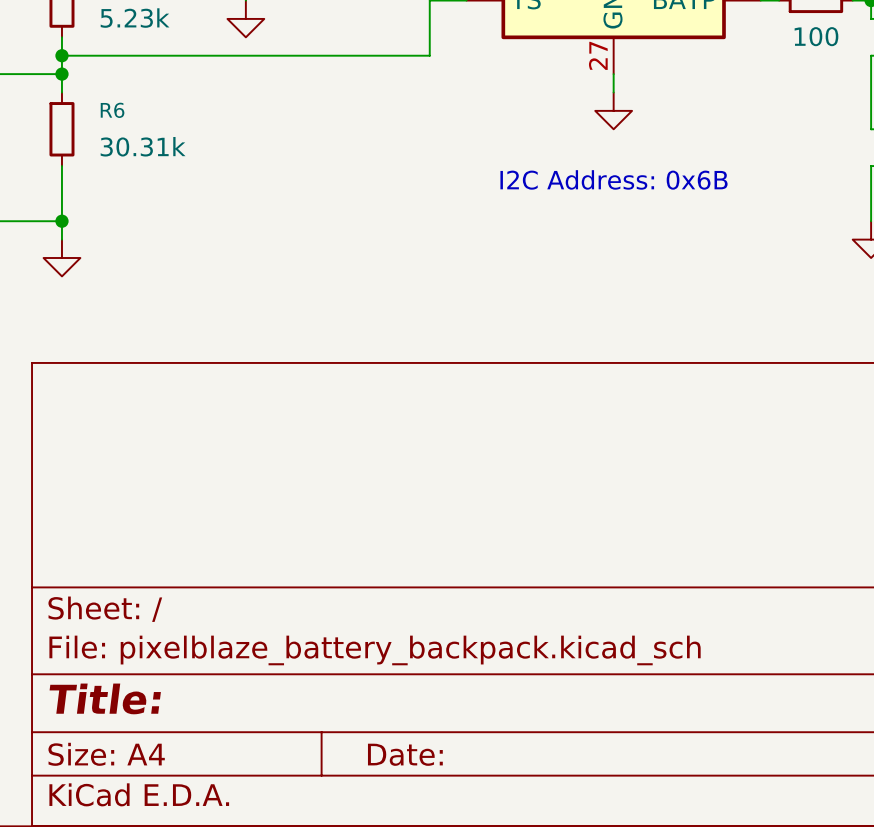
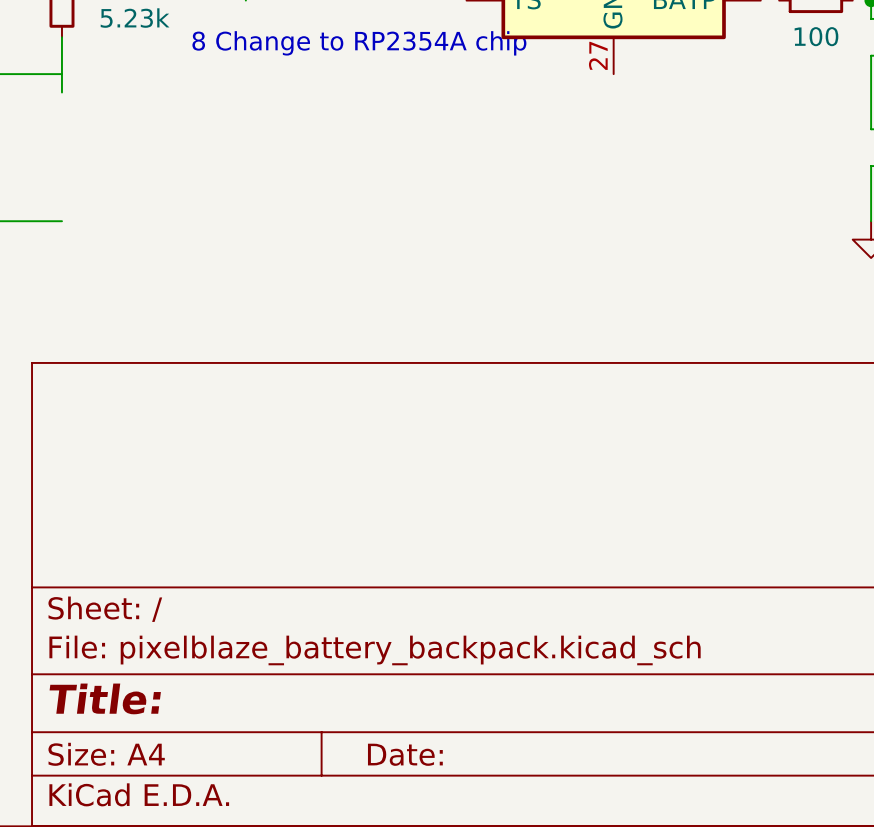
wire: (466, 0) (429, 0) (429, 55) (61, 55) -> none
wire: (760, 0) (779, 0) -> none
wire: (852, 0) (871, 0) -> none
power symbol: (245, 18) -> none
text: none -> 8 Change to RP2354A chip (359, 43)
junction: (61, 55) -> none
junction: (61, 74) -> none
wire: (613, 74) (613, 92) -> none
power symbol: (613, 110) -> none
R6: 30.31k (61, 129) -> none
wire: (61, 166) (61, 239) -> none
text: I2C Address: 0x6B (614, 179) -> none
junction: (61, 221) -> none
power symbol: (61, 257) -> none

